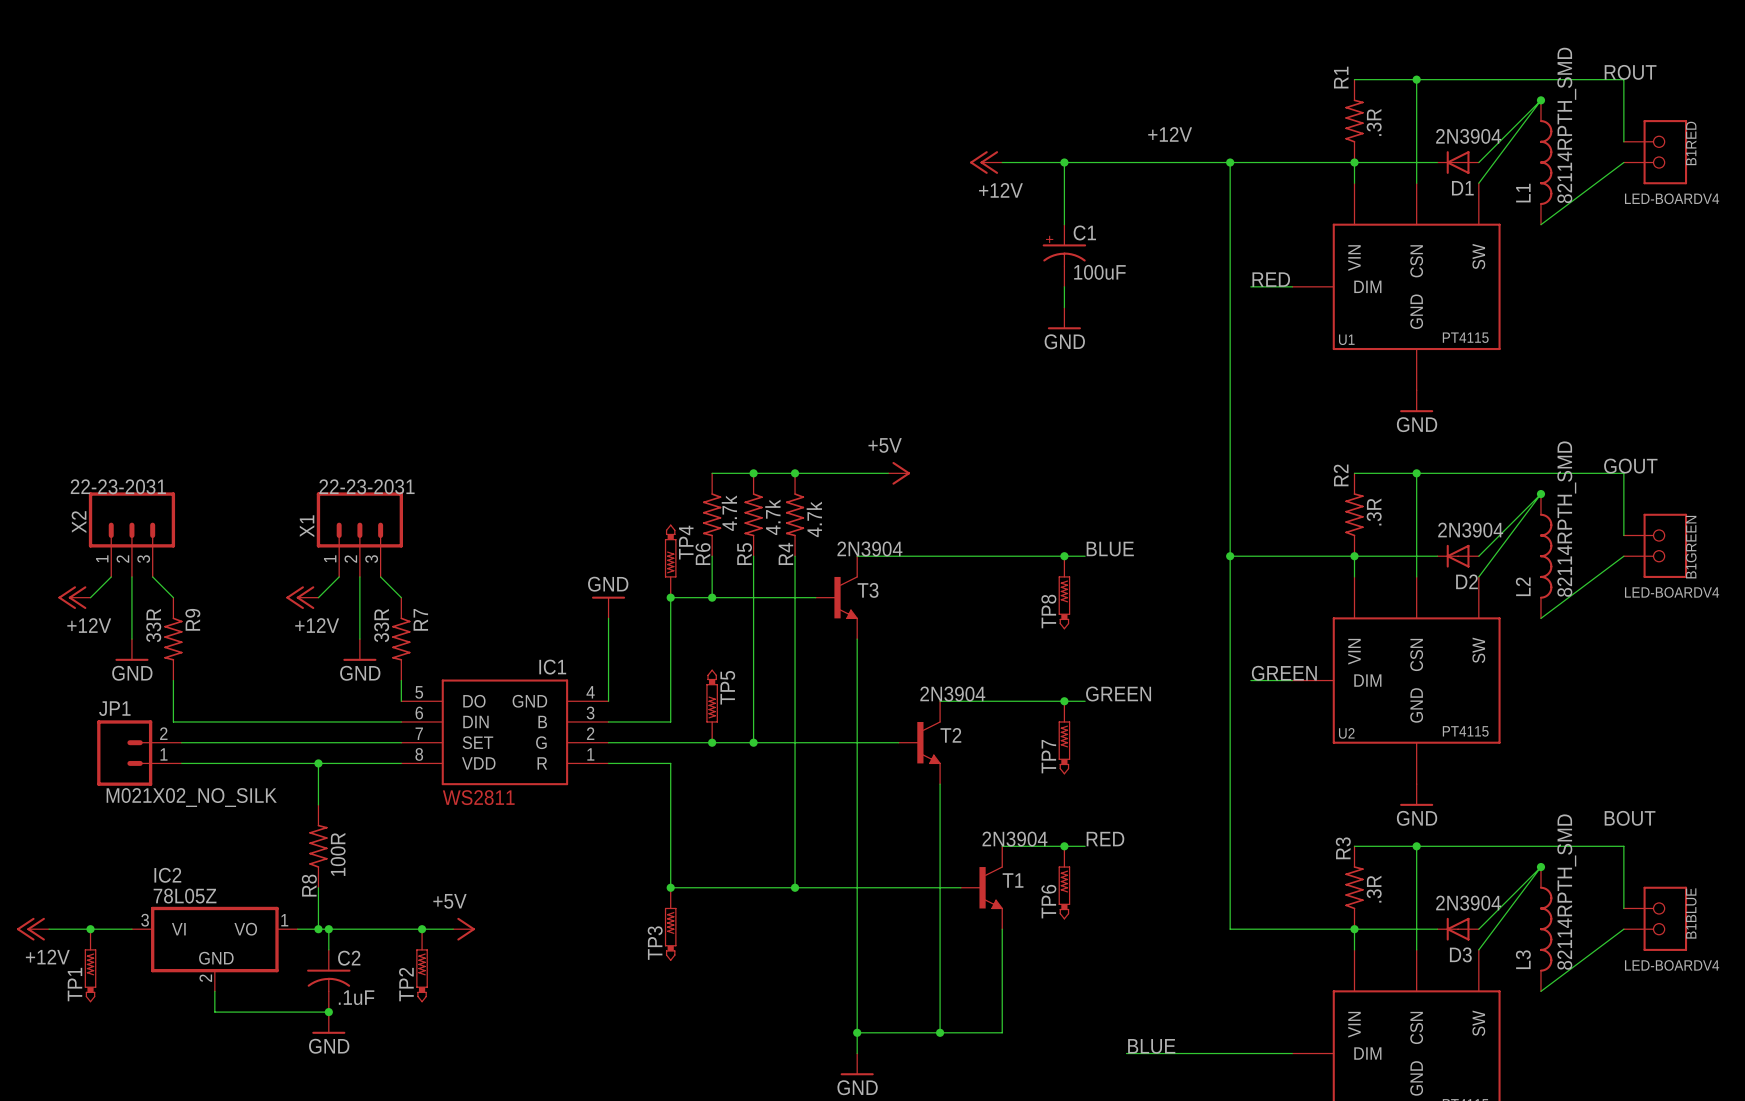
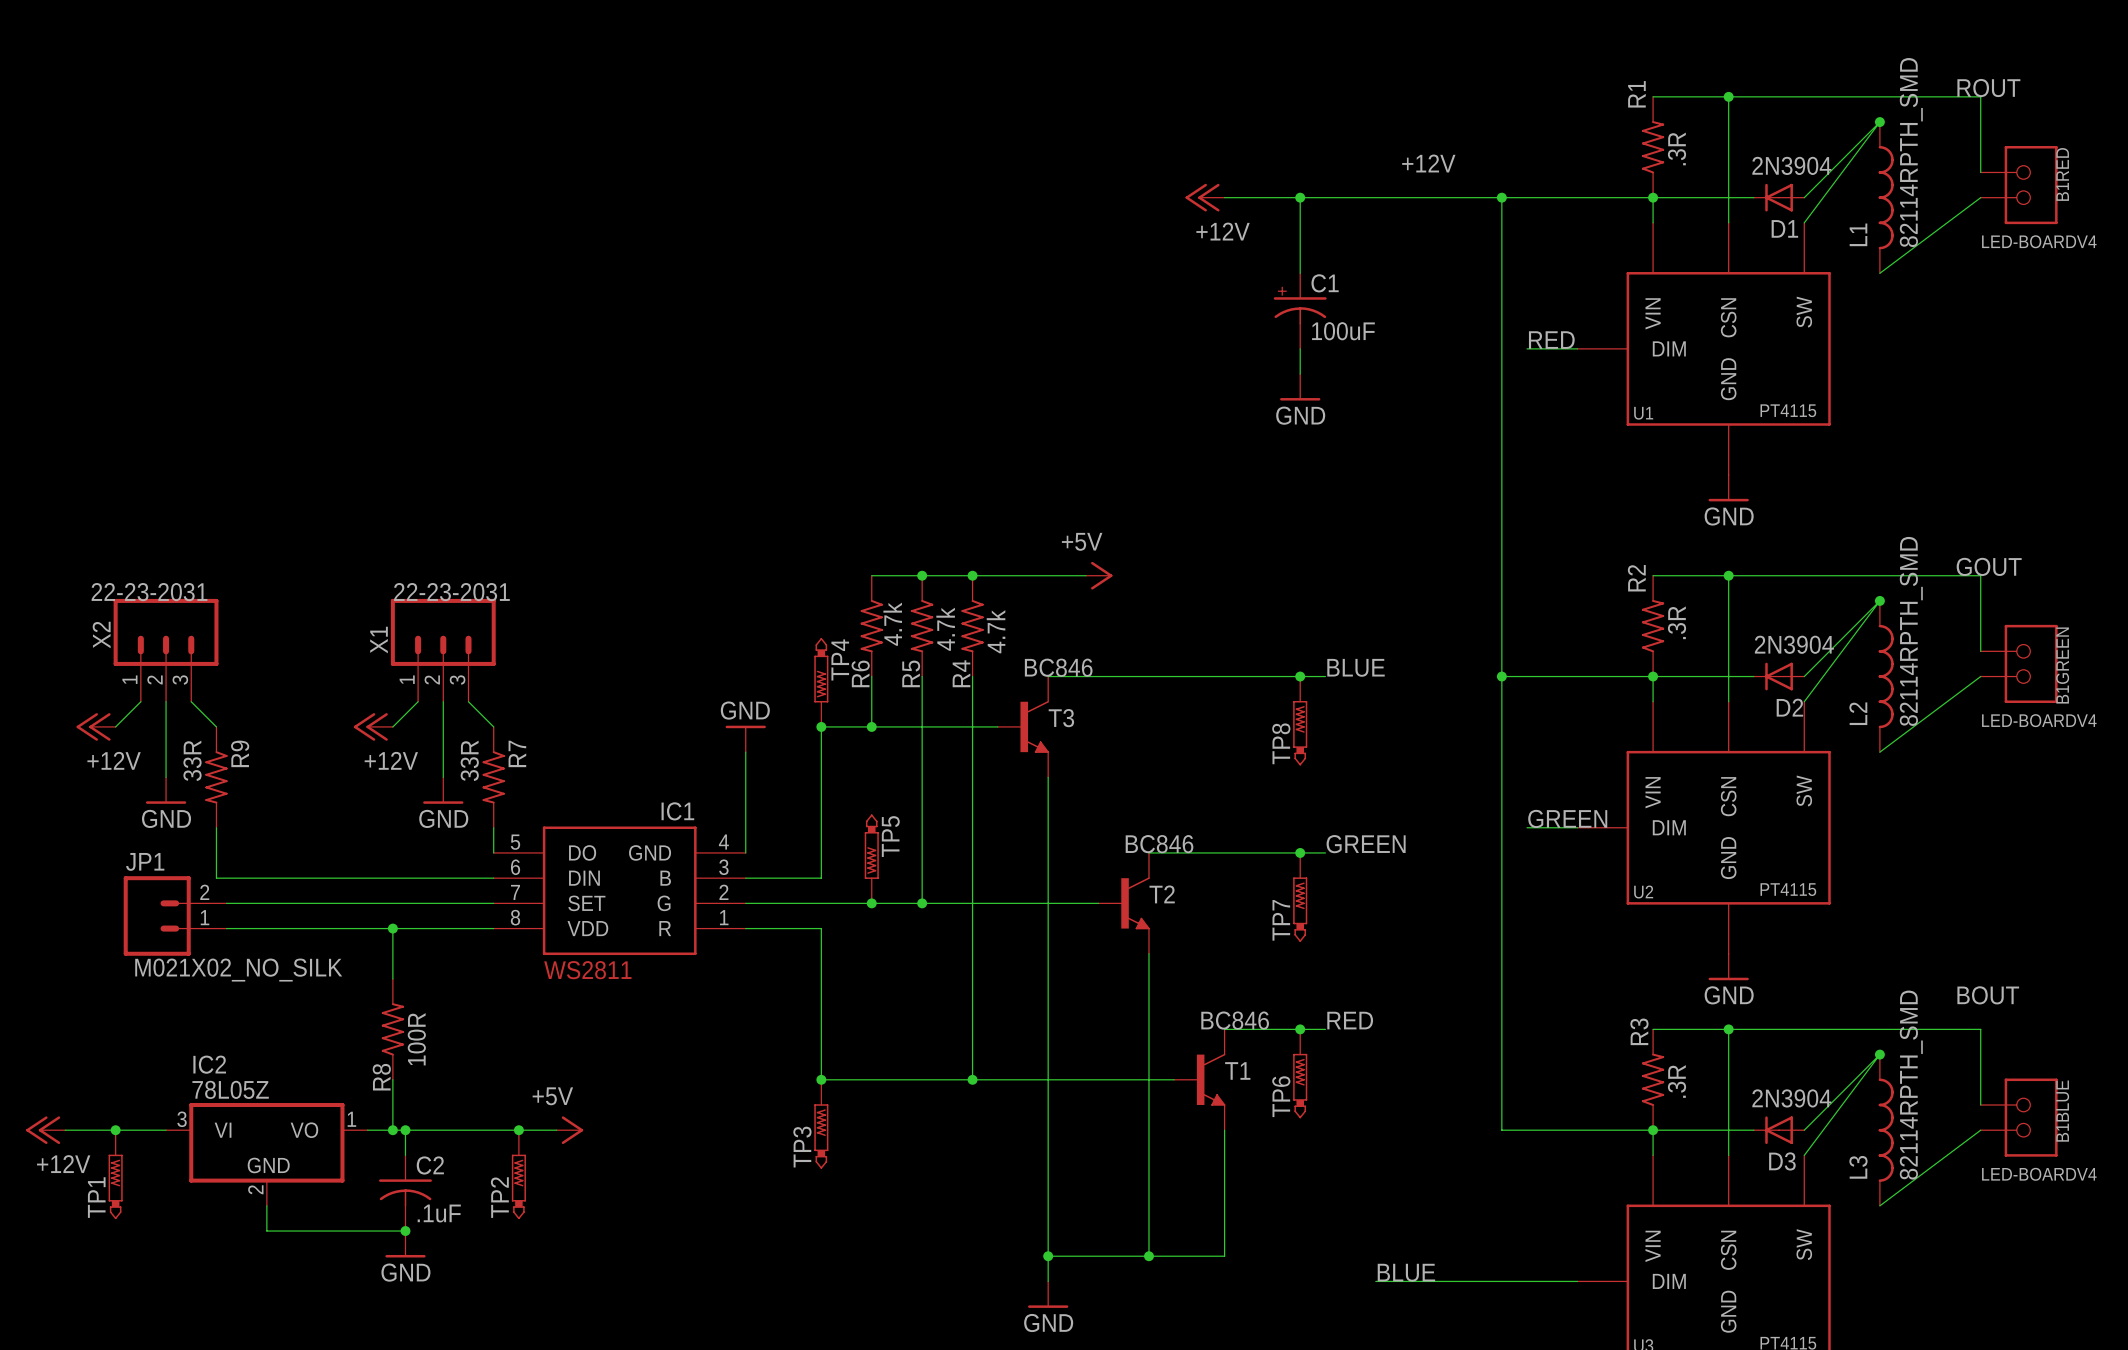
T3 value: 2N3904 (869, 548) -> BC846 (1058, 667)
T2 value: 2N3904 (952, 694) -> BC846 (1159, 844)
T1 value: 2N3904 (1014, 839) -> BC846 (1235, 1020)

